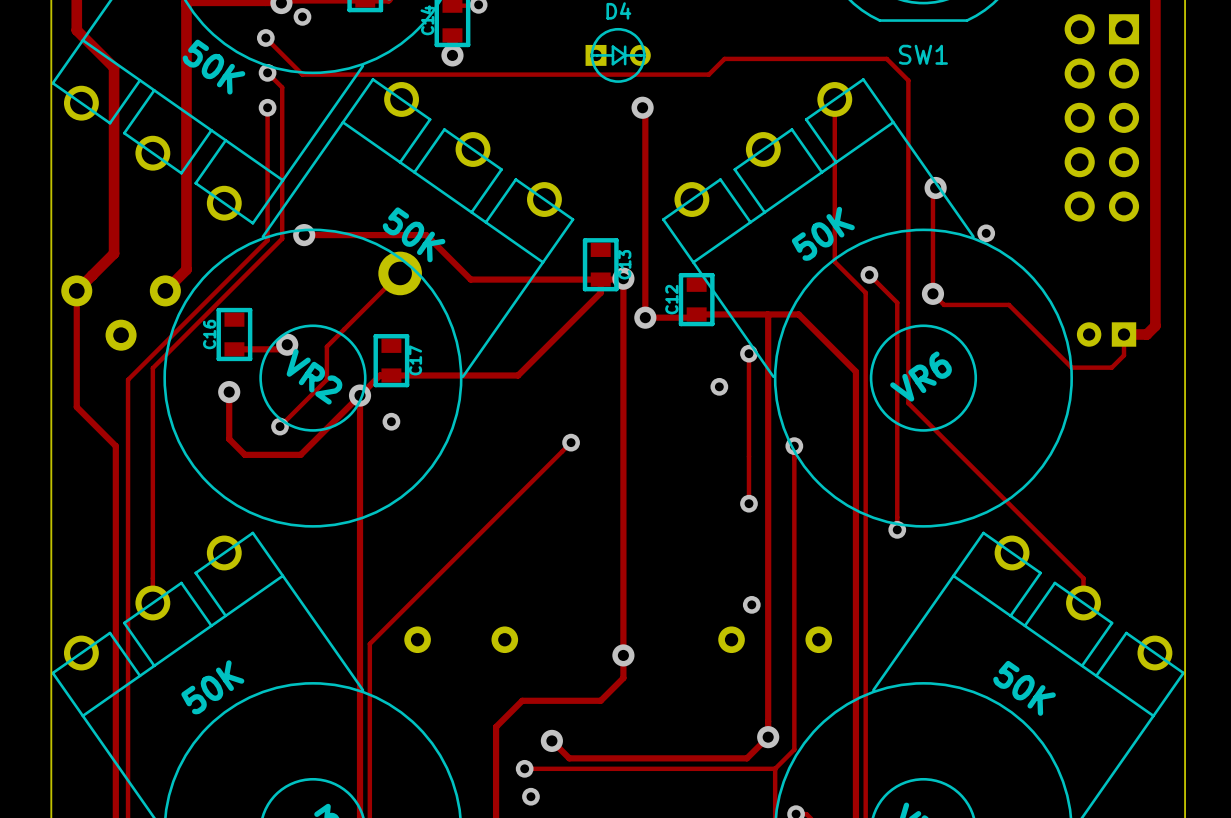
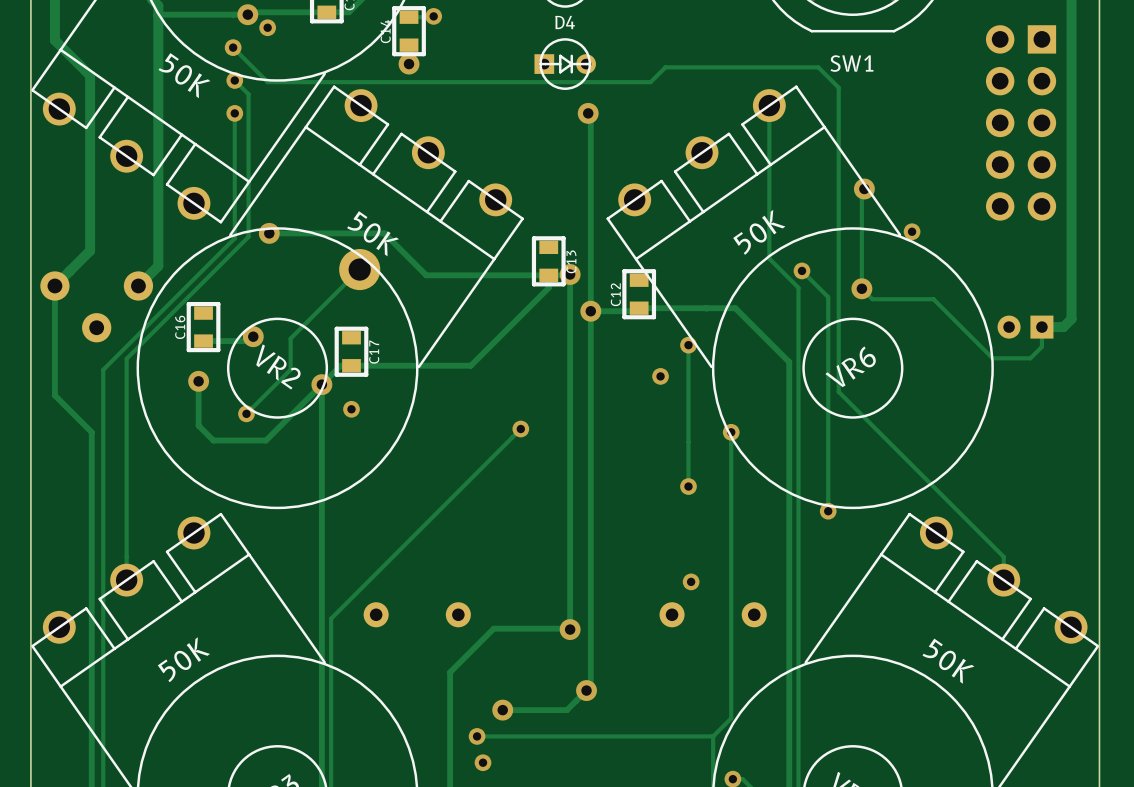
track: (768, 314) (768, 737) (746, 758) (569, 758) (551, 740) -> (590, 311) (590, 686) (566, 710) (502, 710)
track: (623, 653) (623, 678) (600, 700) (522, 700) (496, 726) -> (570, 627) (493, 628) (450, 672) (450, 696)
via: none -> (586, 690)
via: (768, 737) -> none

